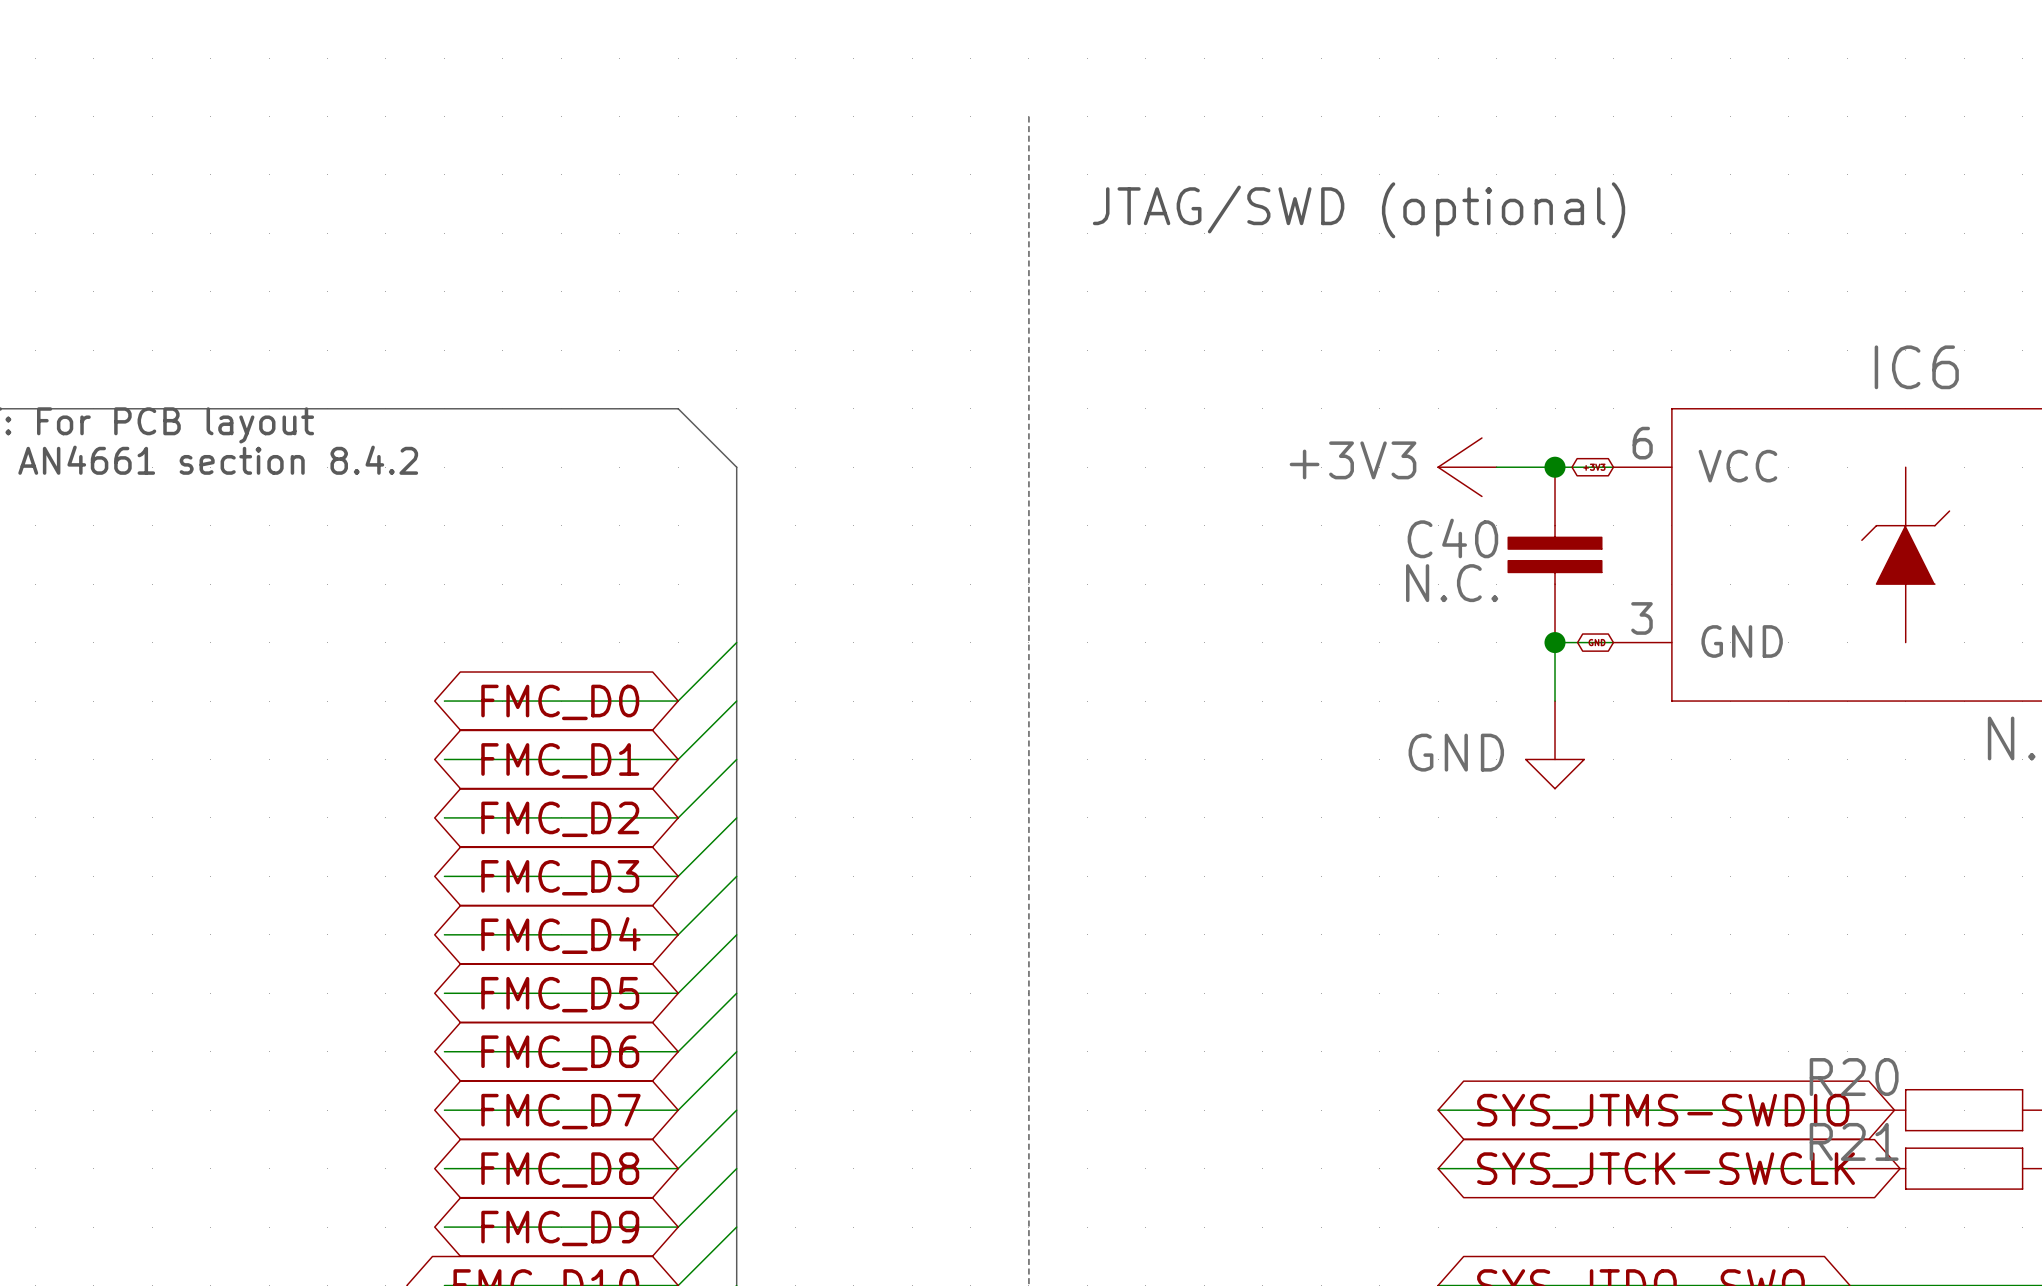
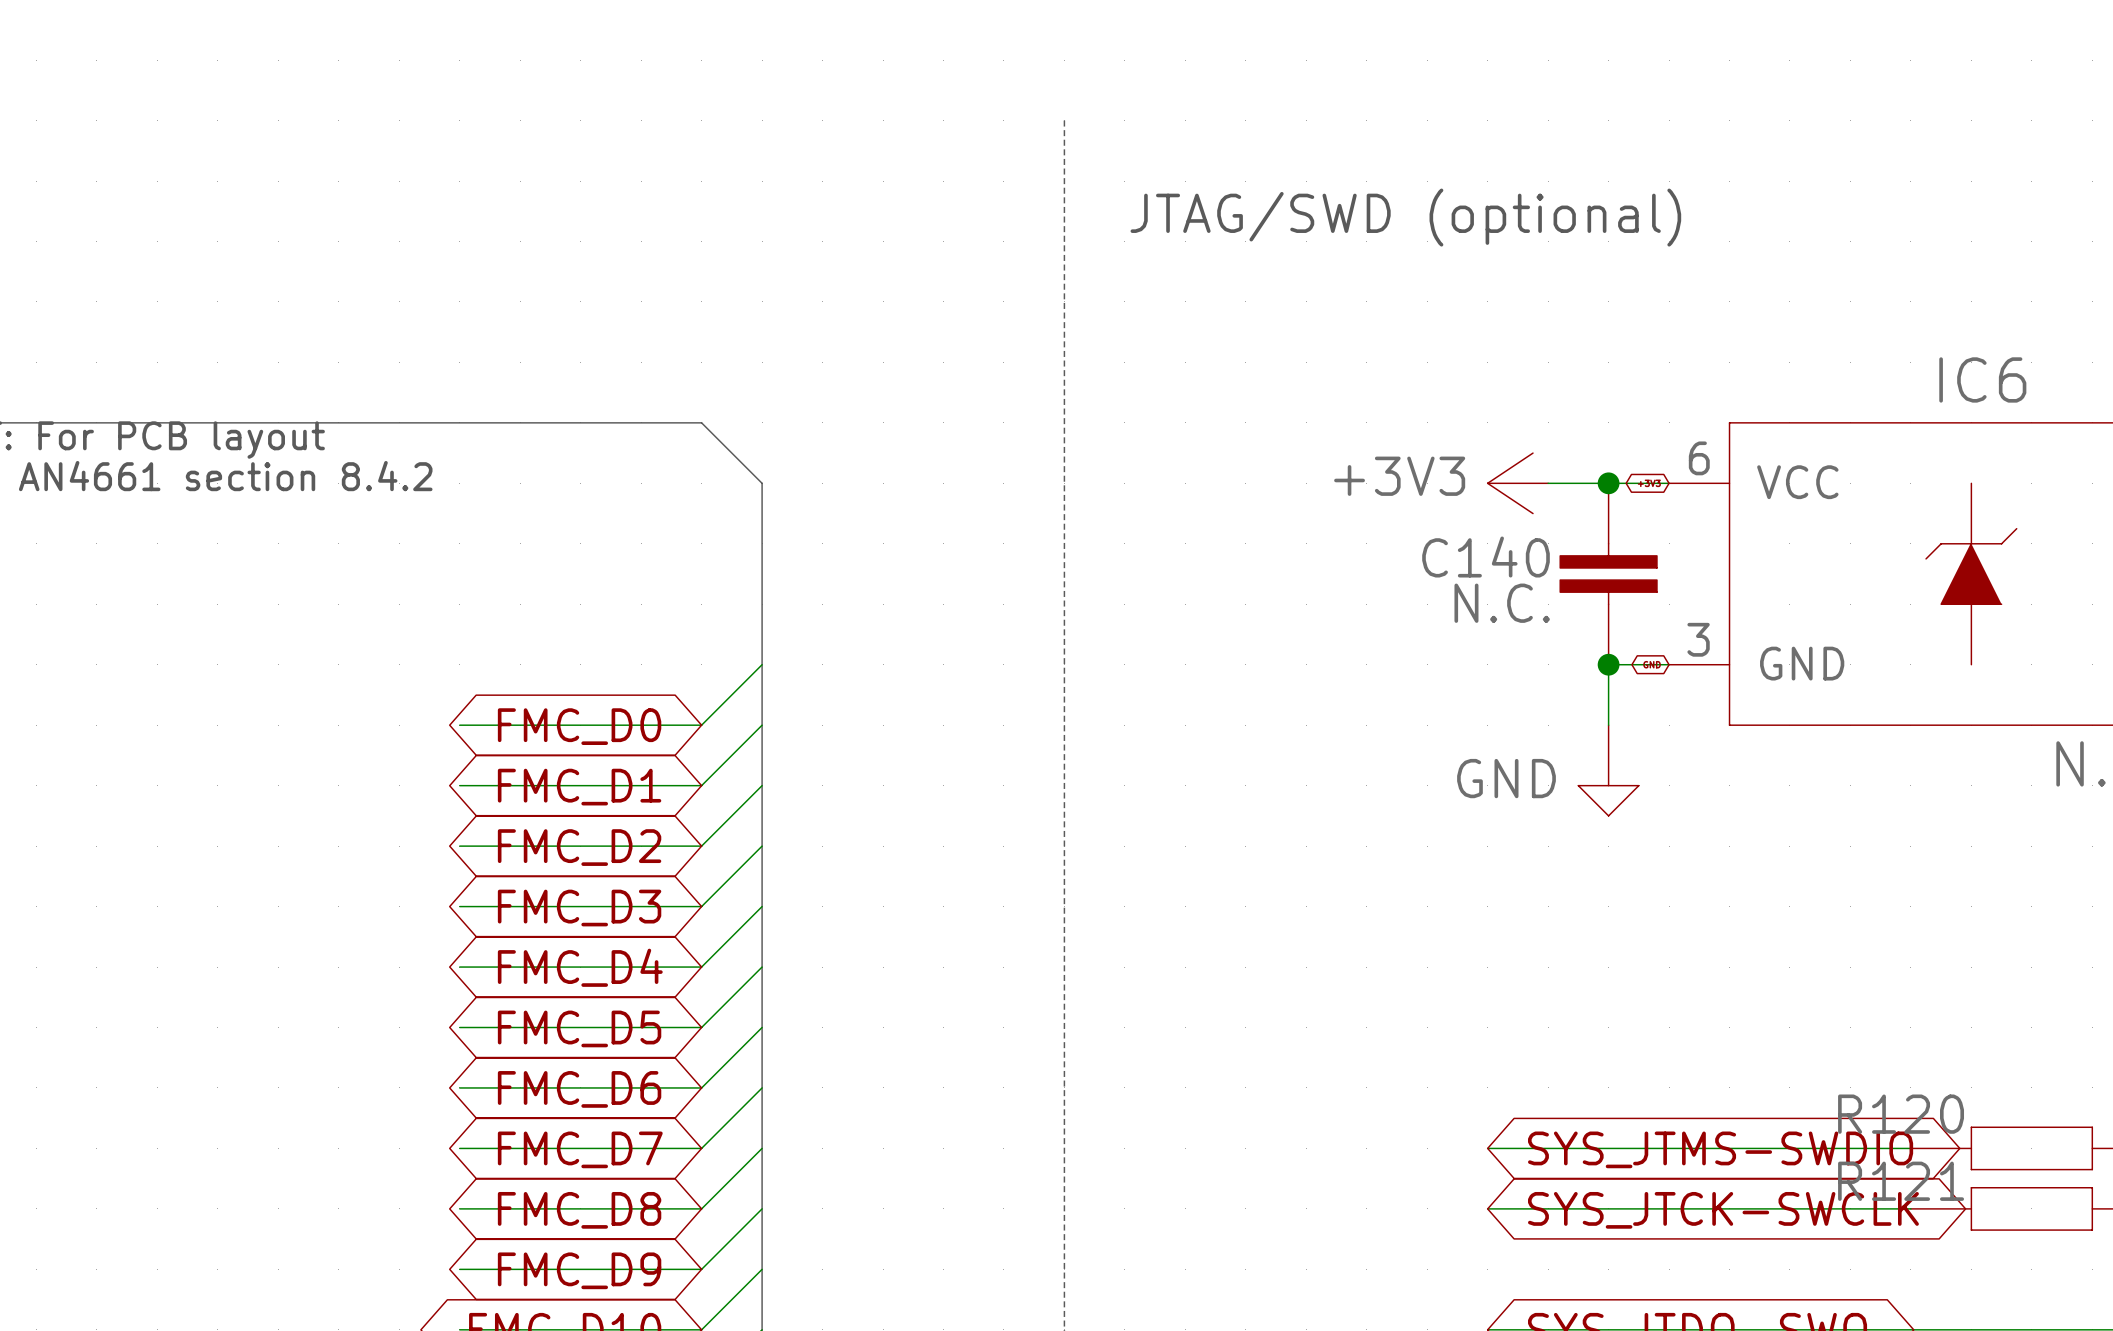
C40 name: C40 (1452, 538) -> C140 (1486, 557)
R20 name: R20 (1854, 1077) -> R120 (1901, 1114)
R21 name: R21 (1854, 1141) -> R121 (1901, 1181)

